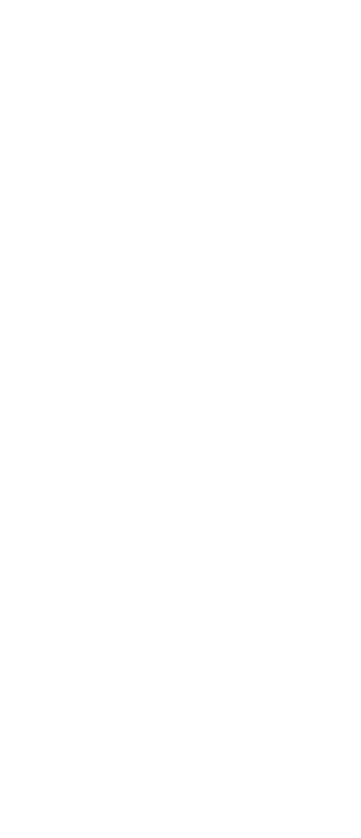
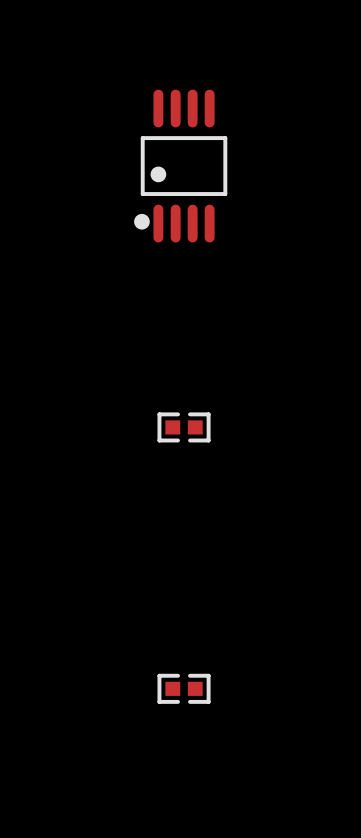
part: none -> (180, 166)
part: none -> (184, 427)
part: none -> (184, 688)

